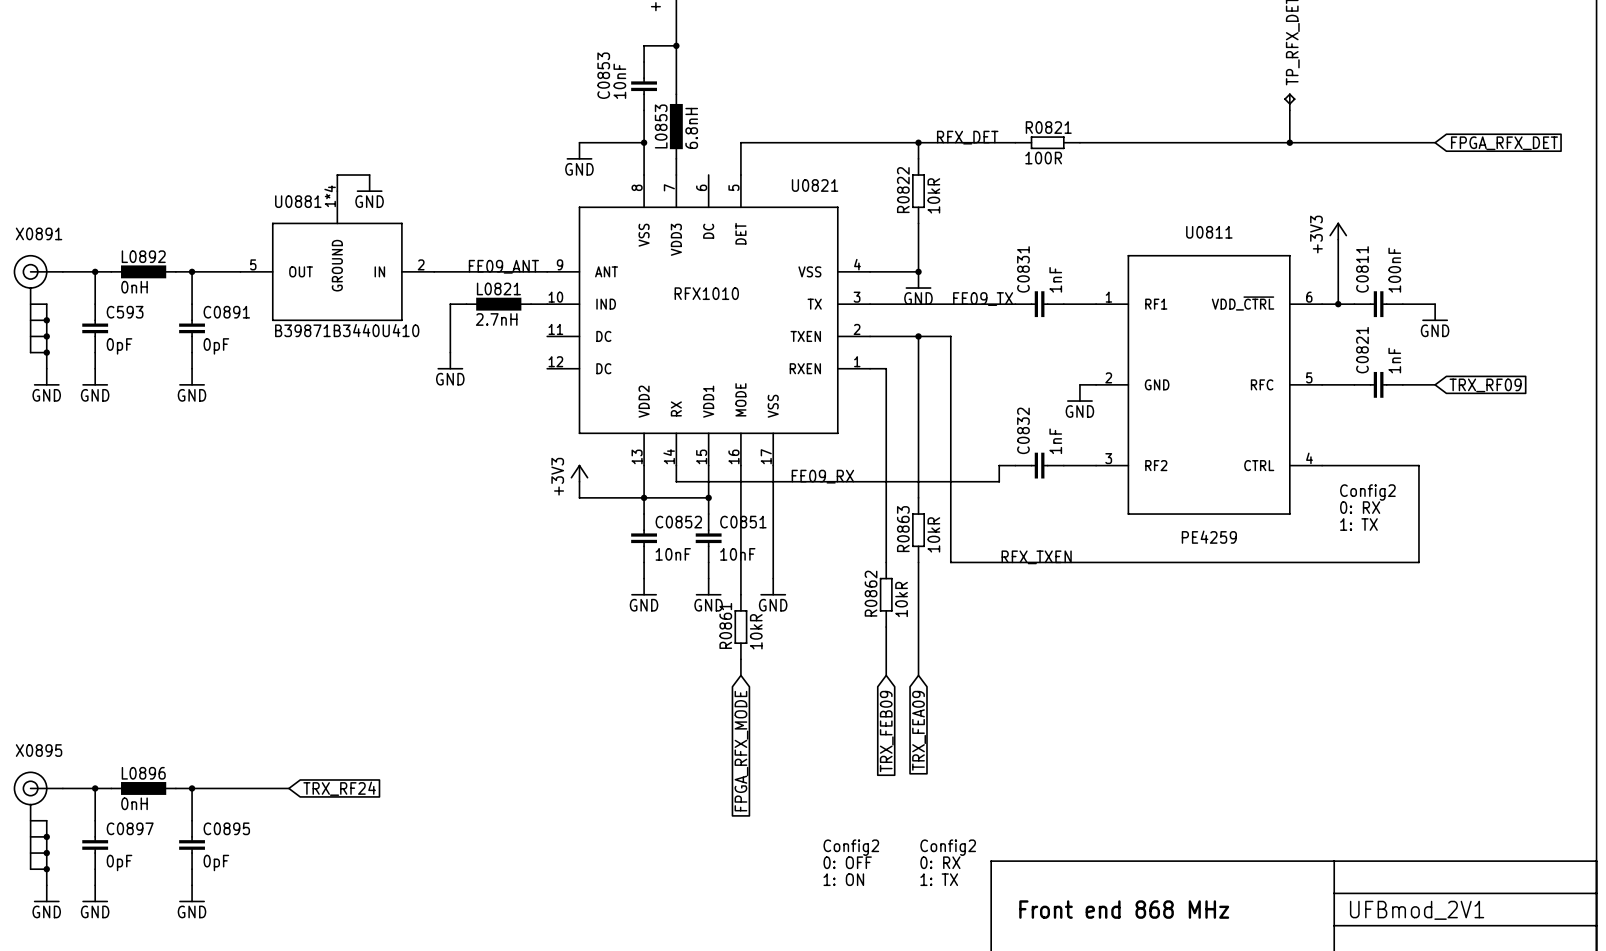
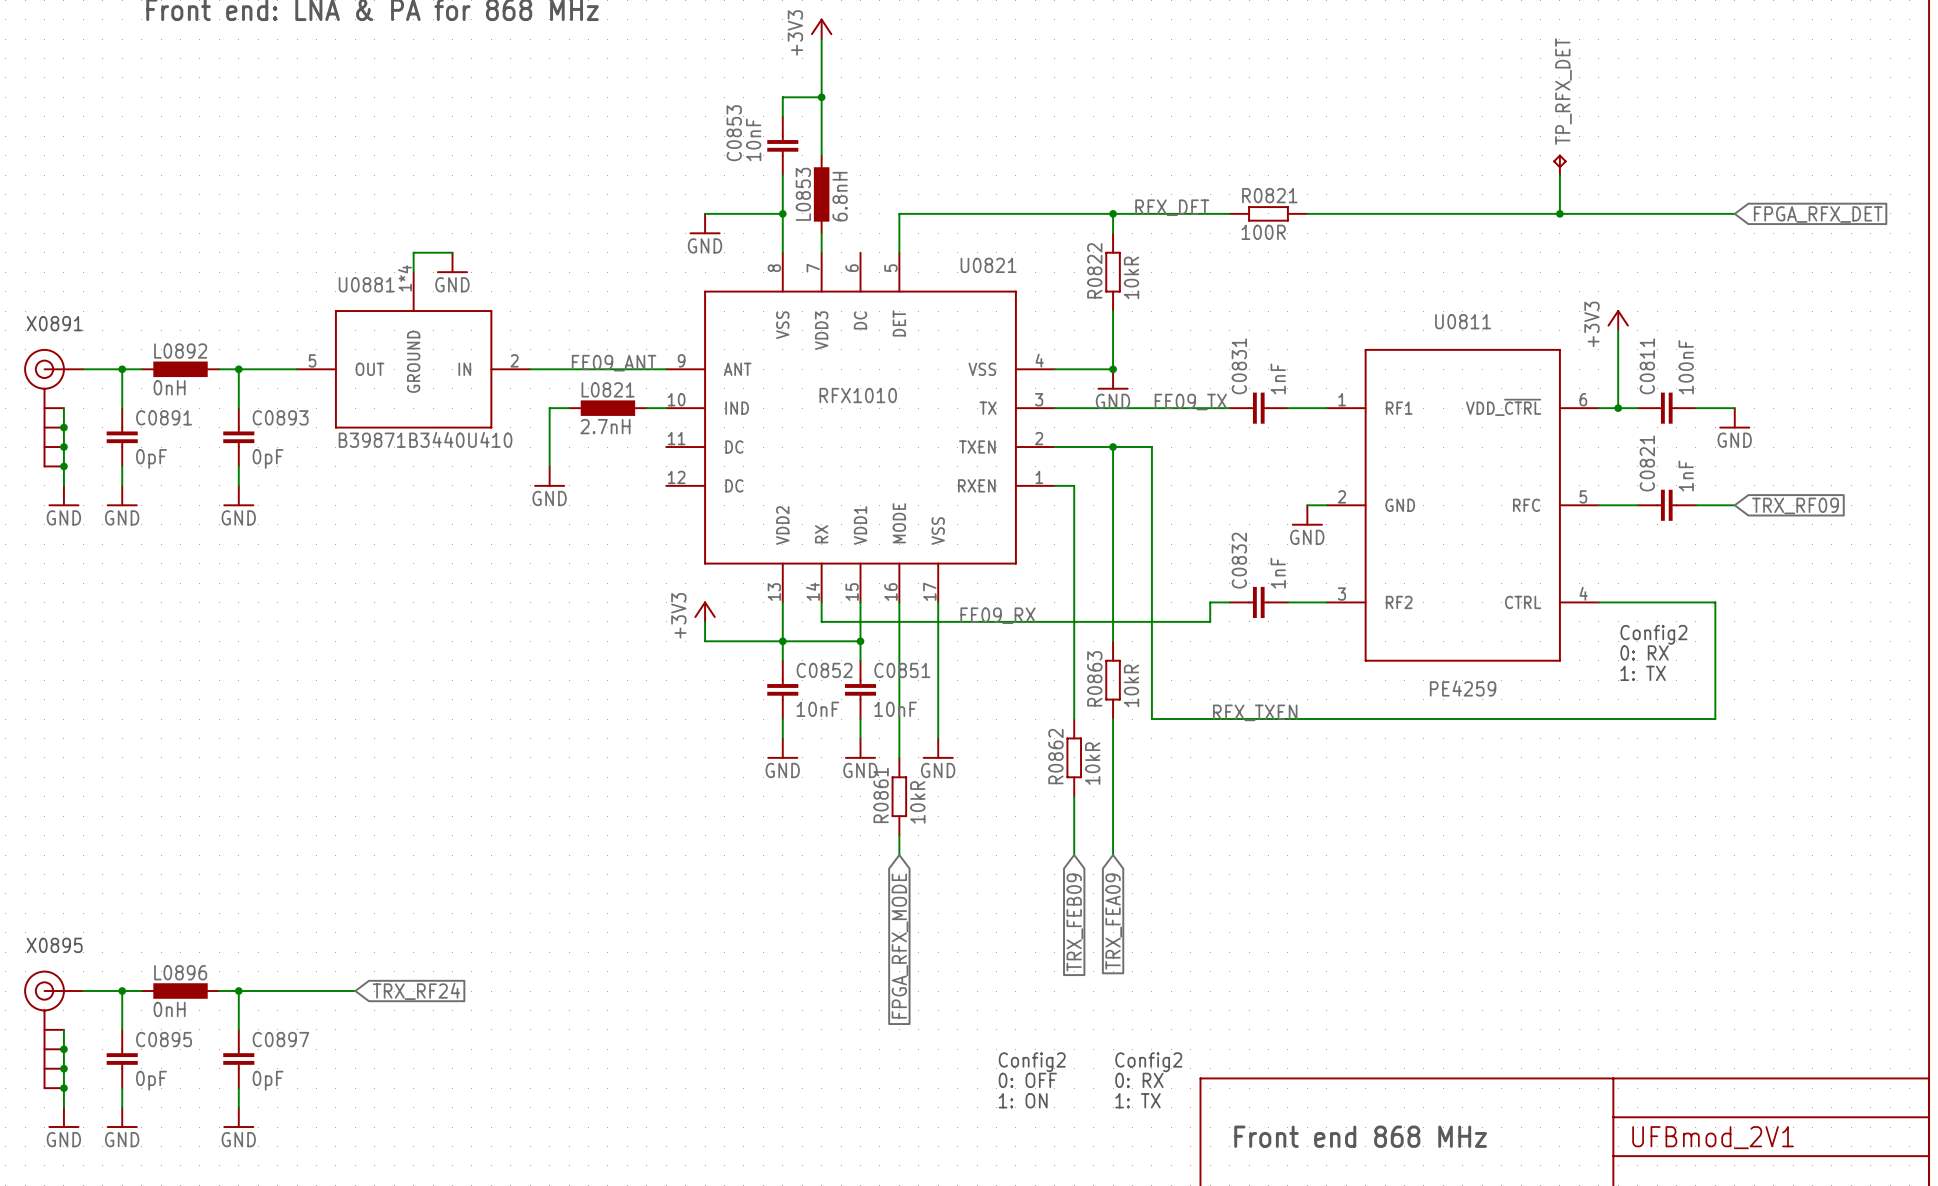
C593 name: C593 (125, 312) -> C0891 (164, 417)
C0891 name: C0891 (226, 312) -> C0893 (280, 417)
C0897 name: C0897 (130, 828) -> C0895 (164, 1039)
C0895 name: C0895 (226, 828) -> C0897 (280, 1039)

